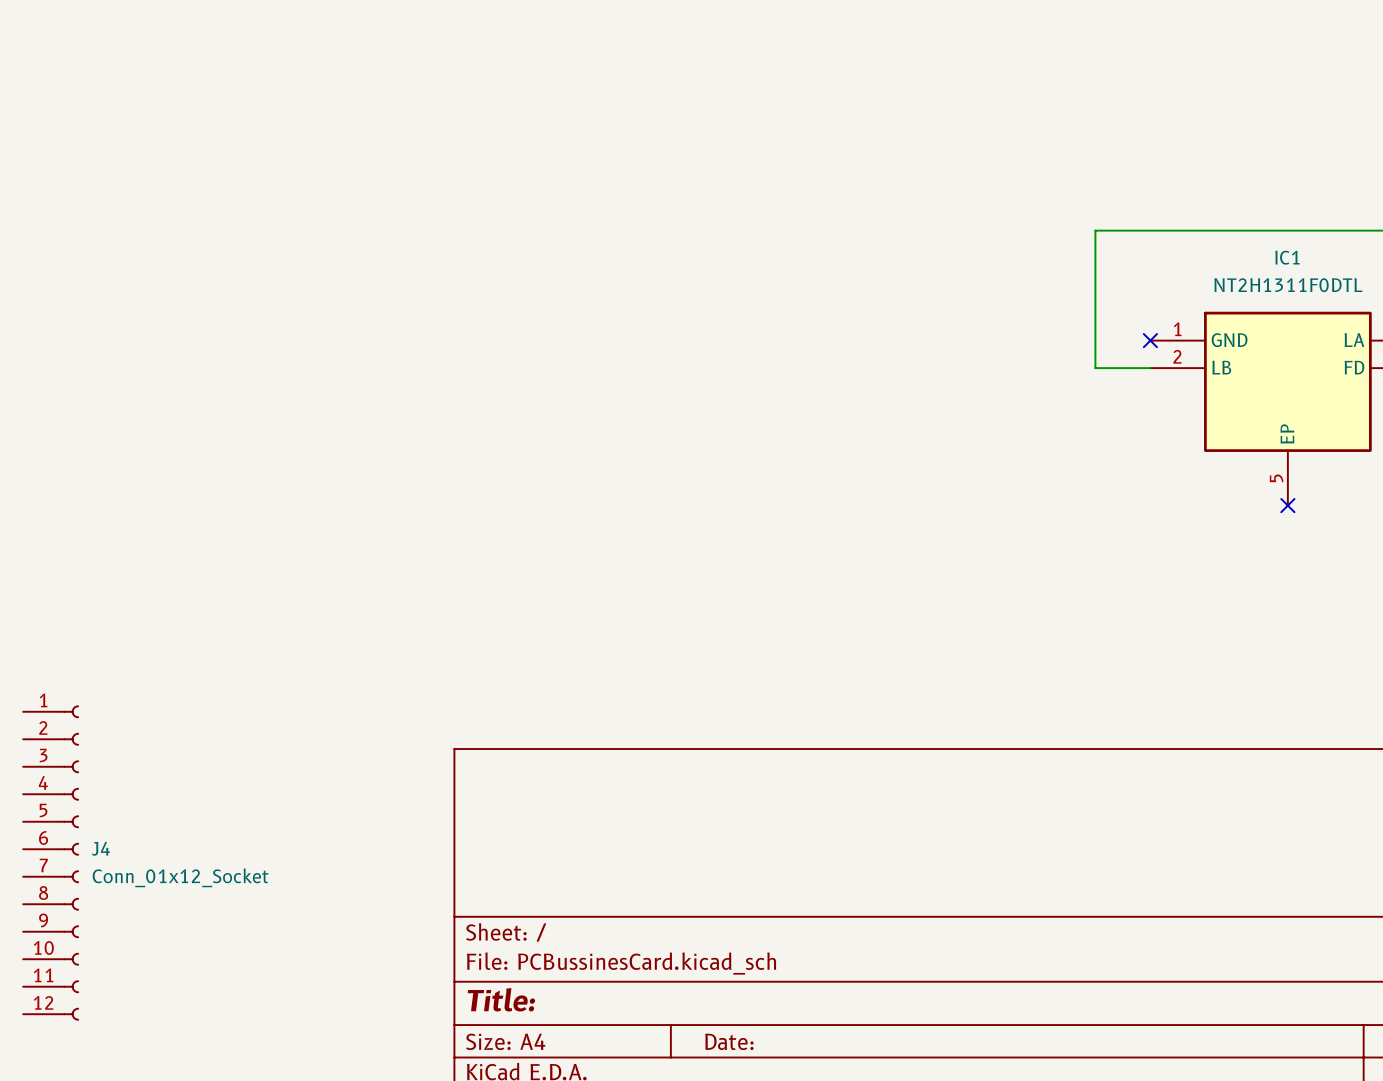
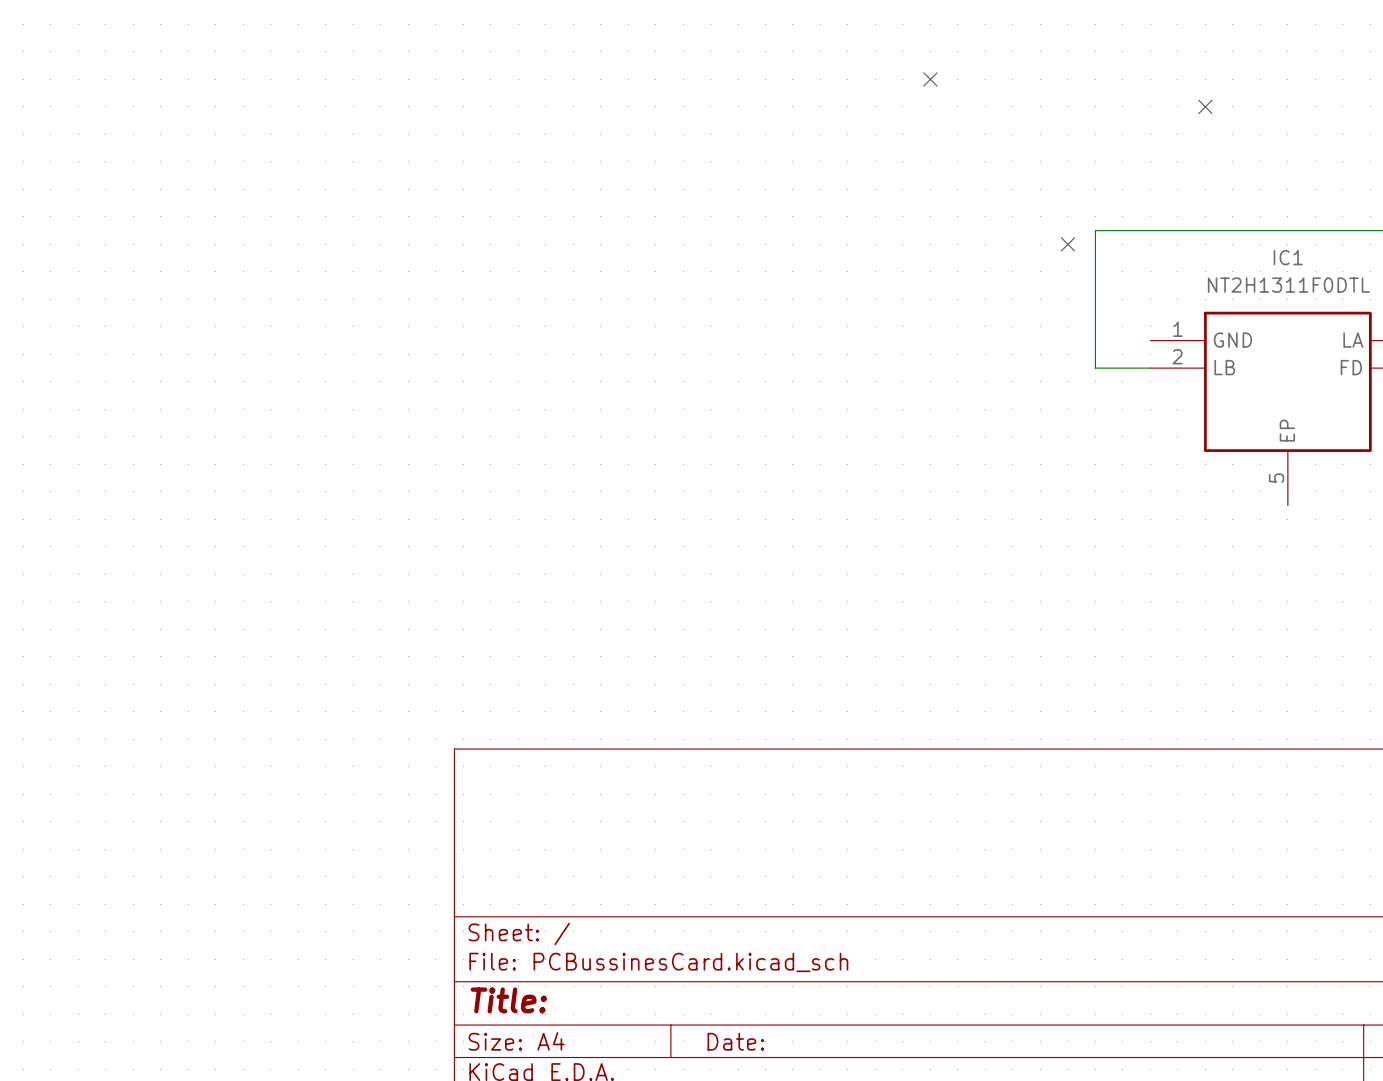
no-connect mark: none -> (930, 79)
no-connect mark: none -> (1205, 106)
no-connect mark: none -> (1067, 244)
no-connect mark: (1150, 340) -> none
no-connect mark: (1287, 505) -> none
J4: Conn_01x12_Socket (51, 863) -> none

